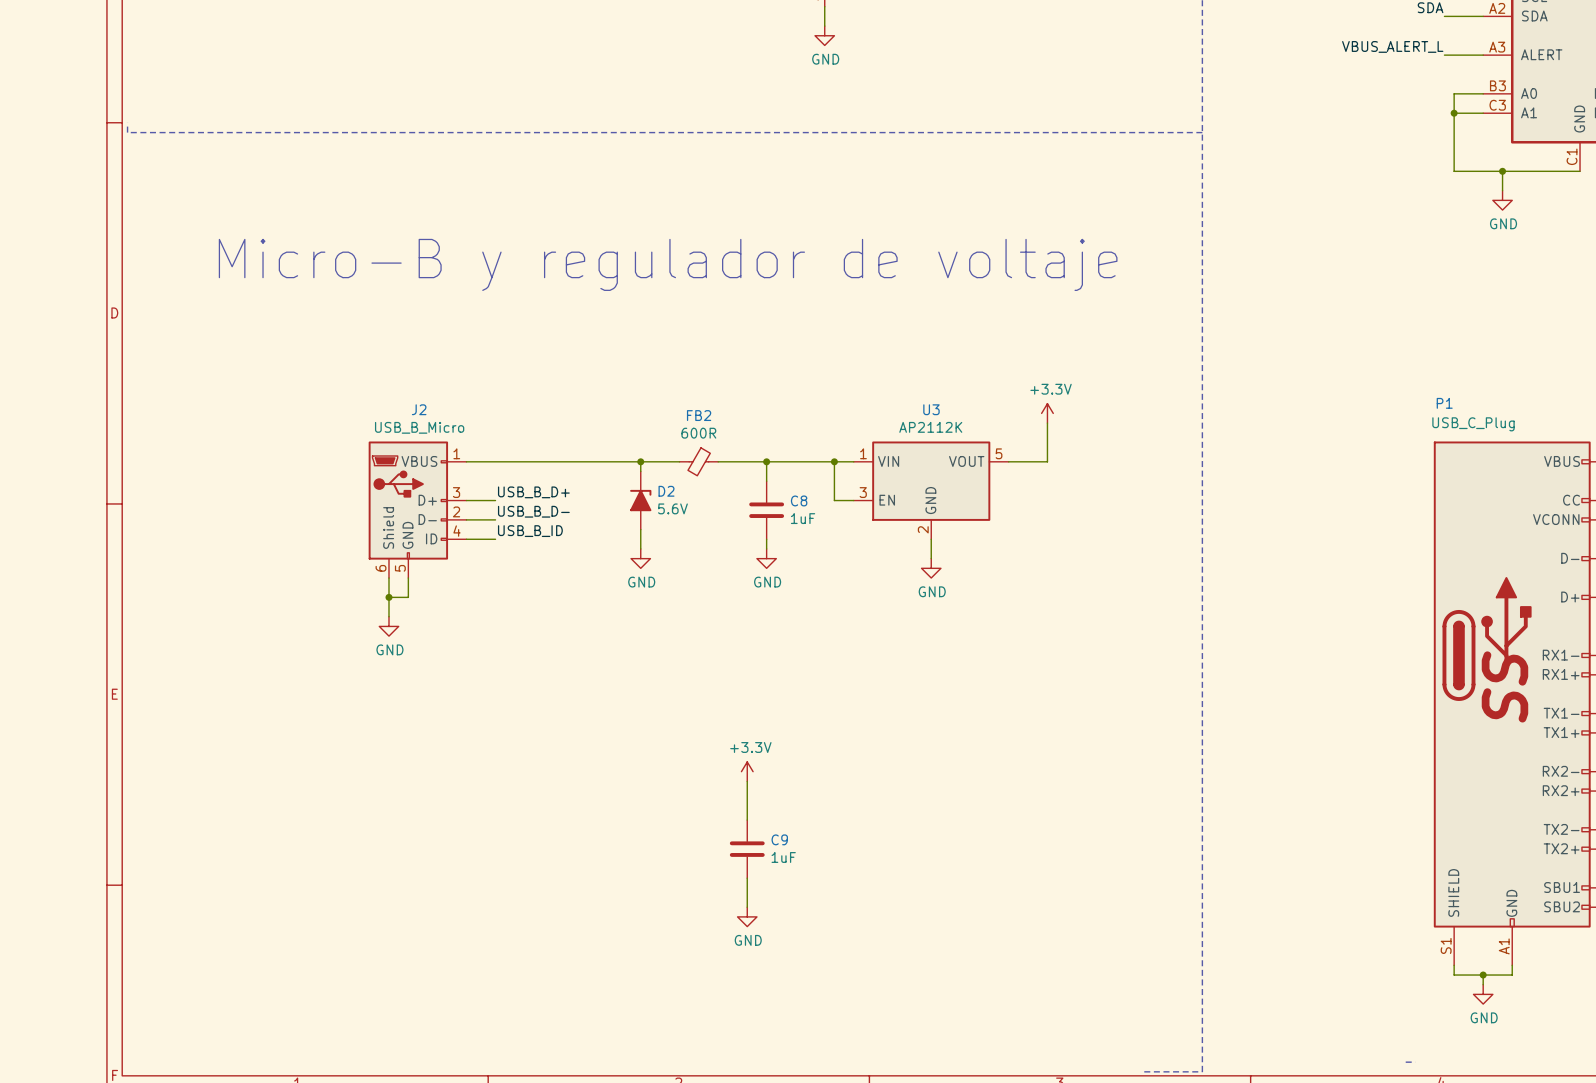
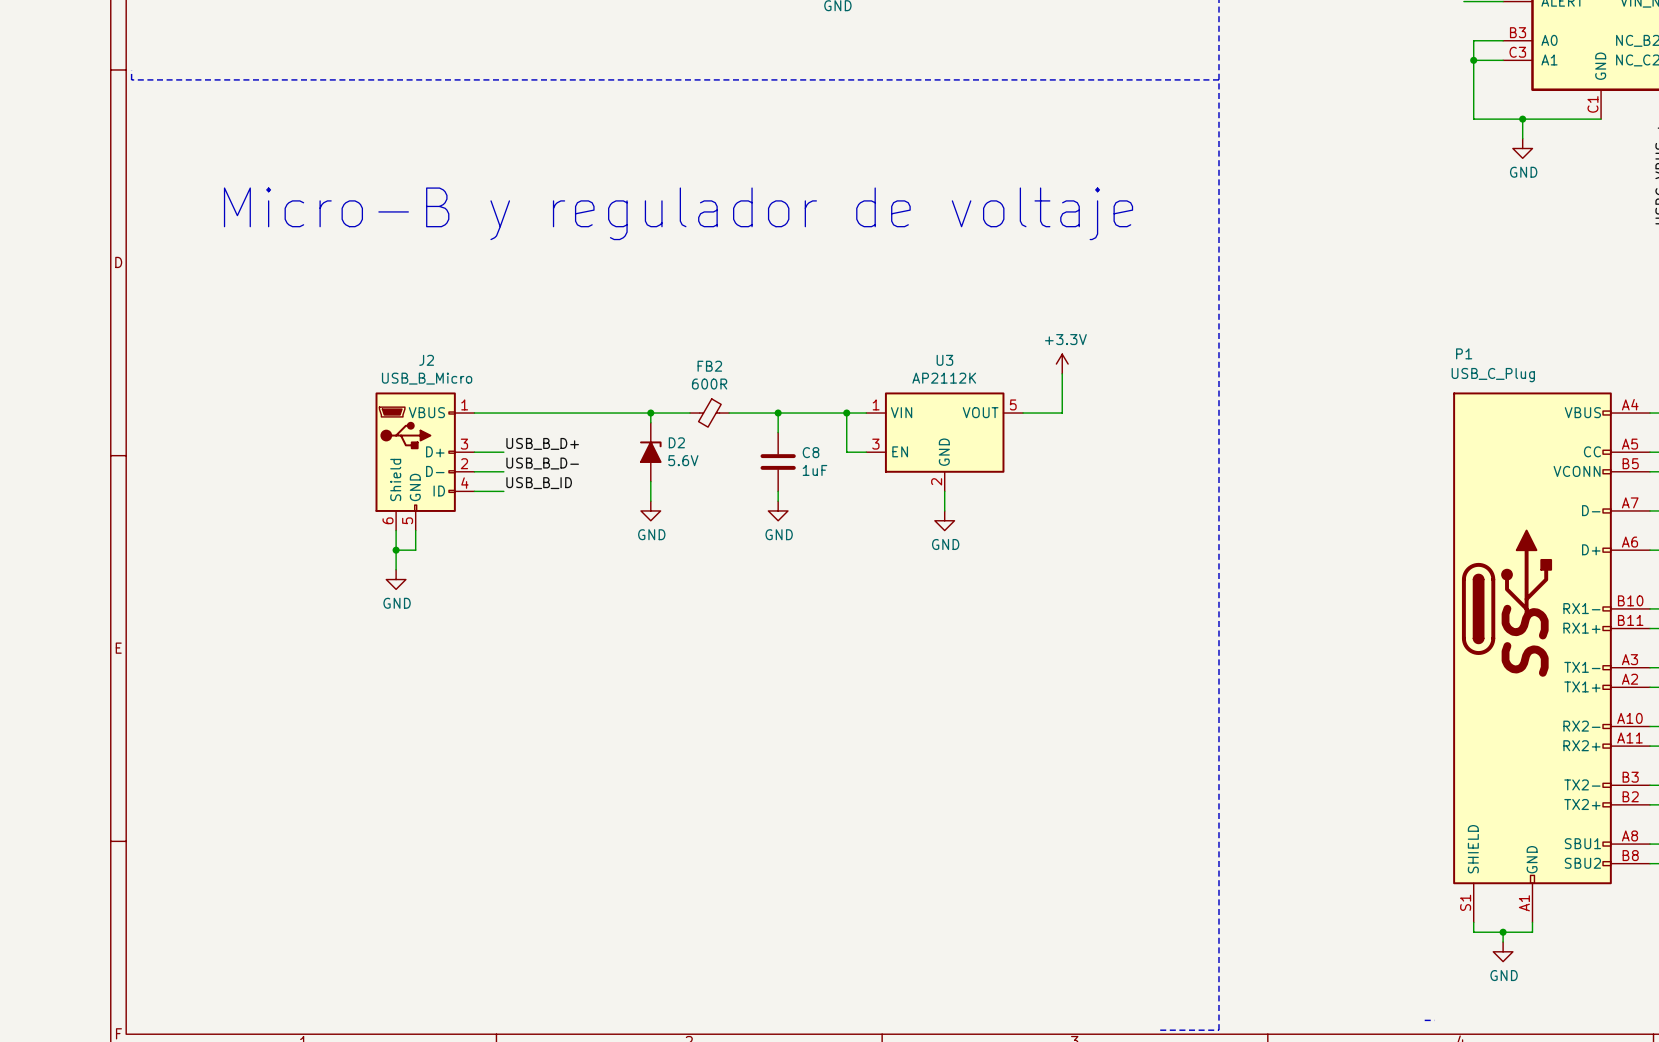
power symbol: +3.3V (747, 771) -> none
wire: (747, 781) (747, 820) -> none
C9: 1uF (747, 849) -> none
wire: (747, 878) (747, 907) -> none
power symbol: GND (747, 916) -> none

